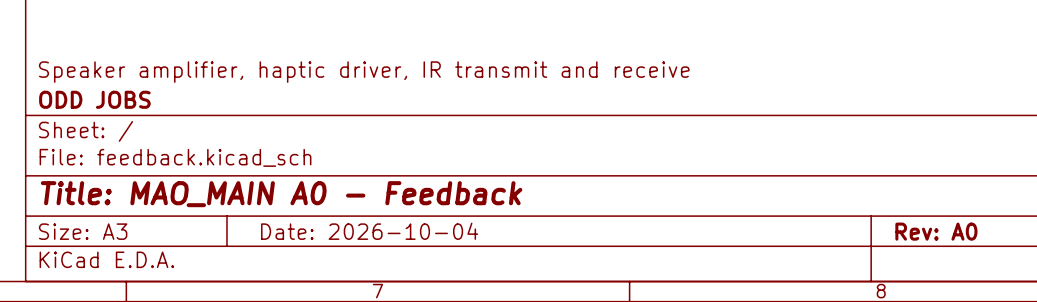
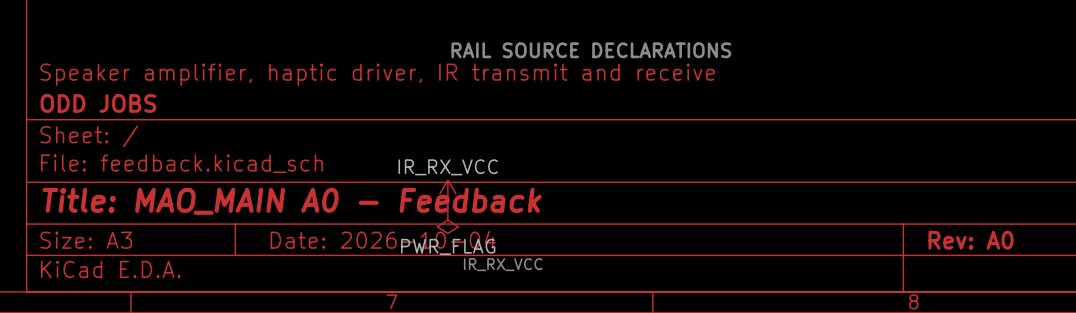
text: none -> RAIL SOURCE DECLARATIONS (591, 50)
power symbol: none -> IR_RX_VCC (447, 193)
power symbol: none -> PWR_FLAG (447, 220)
text: none -> IR_RX_VCC (503, 264)

